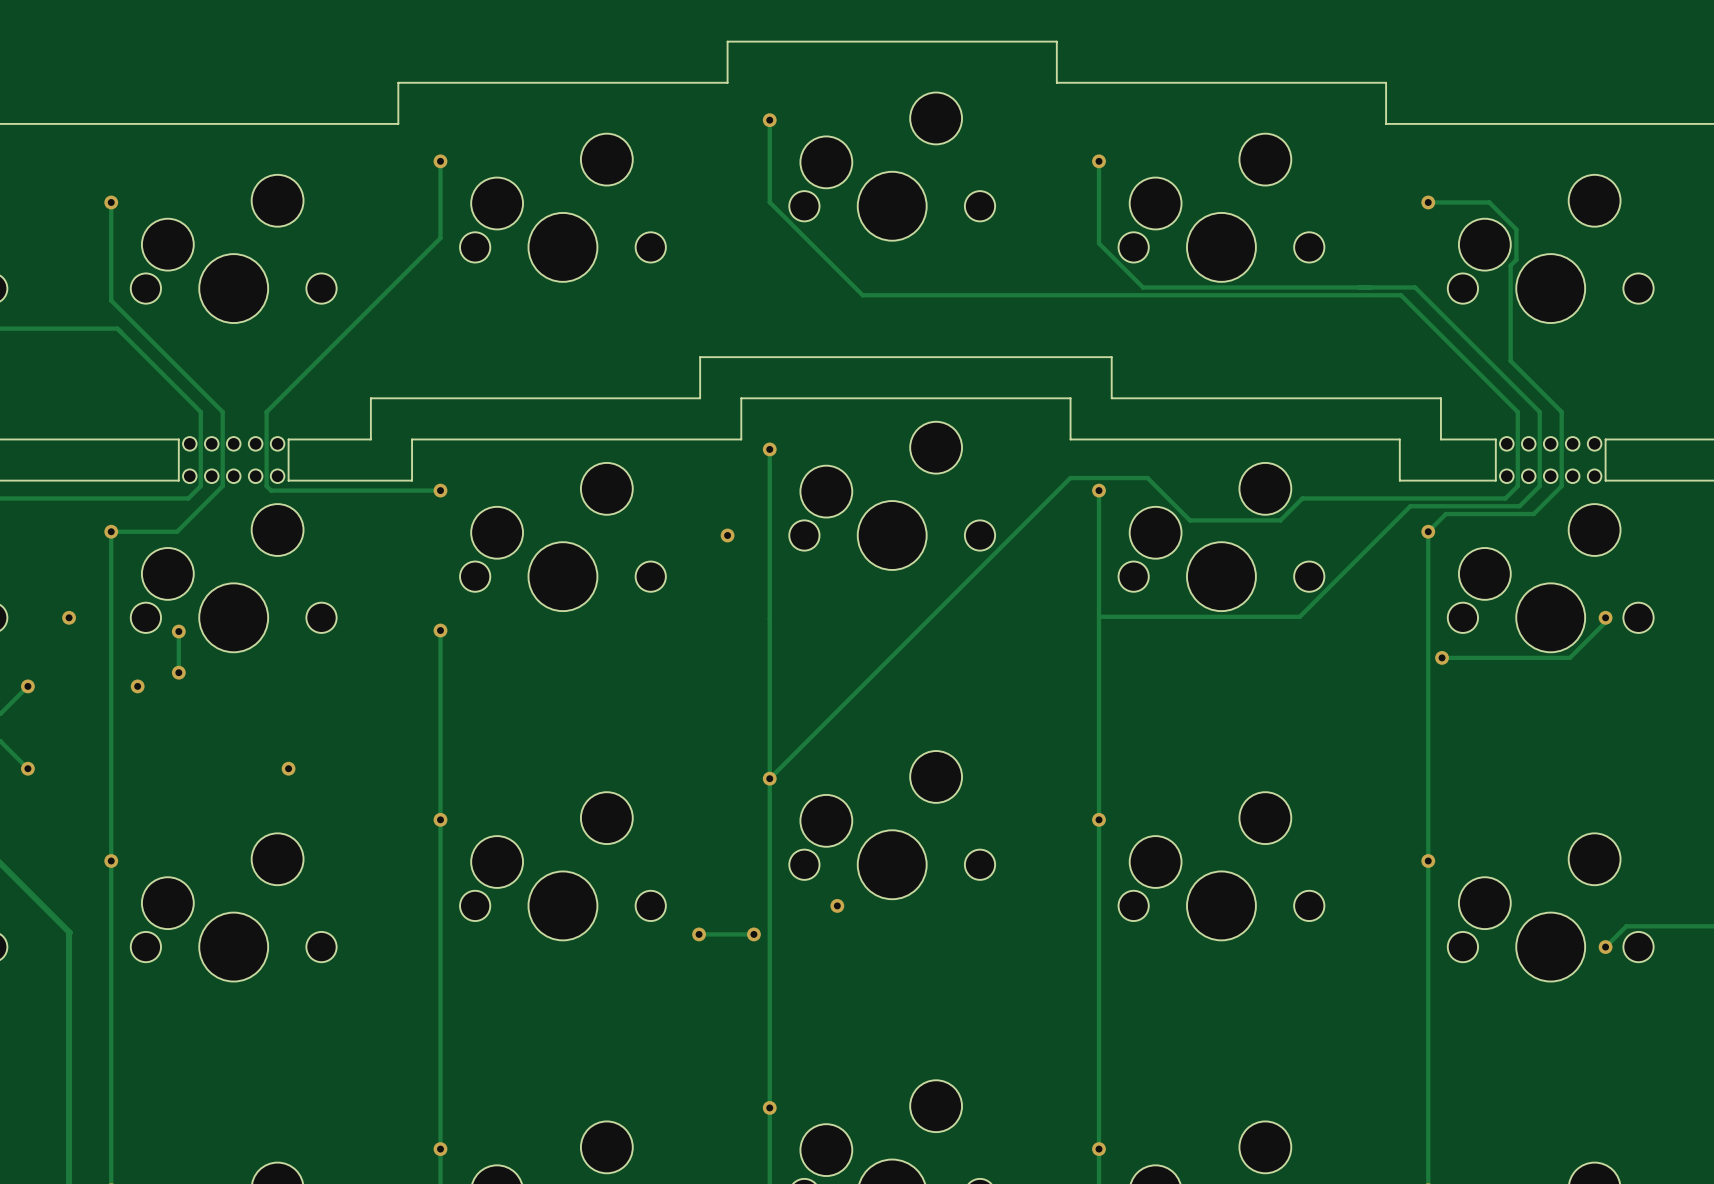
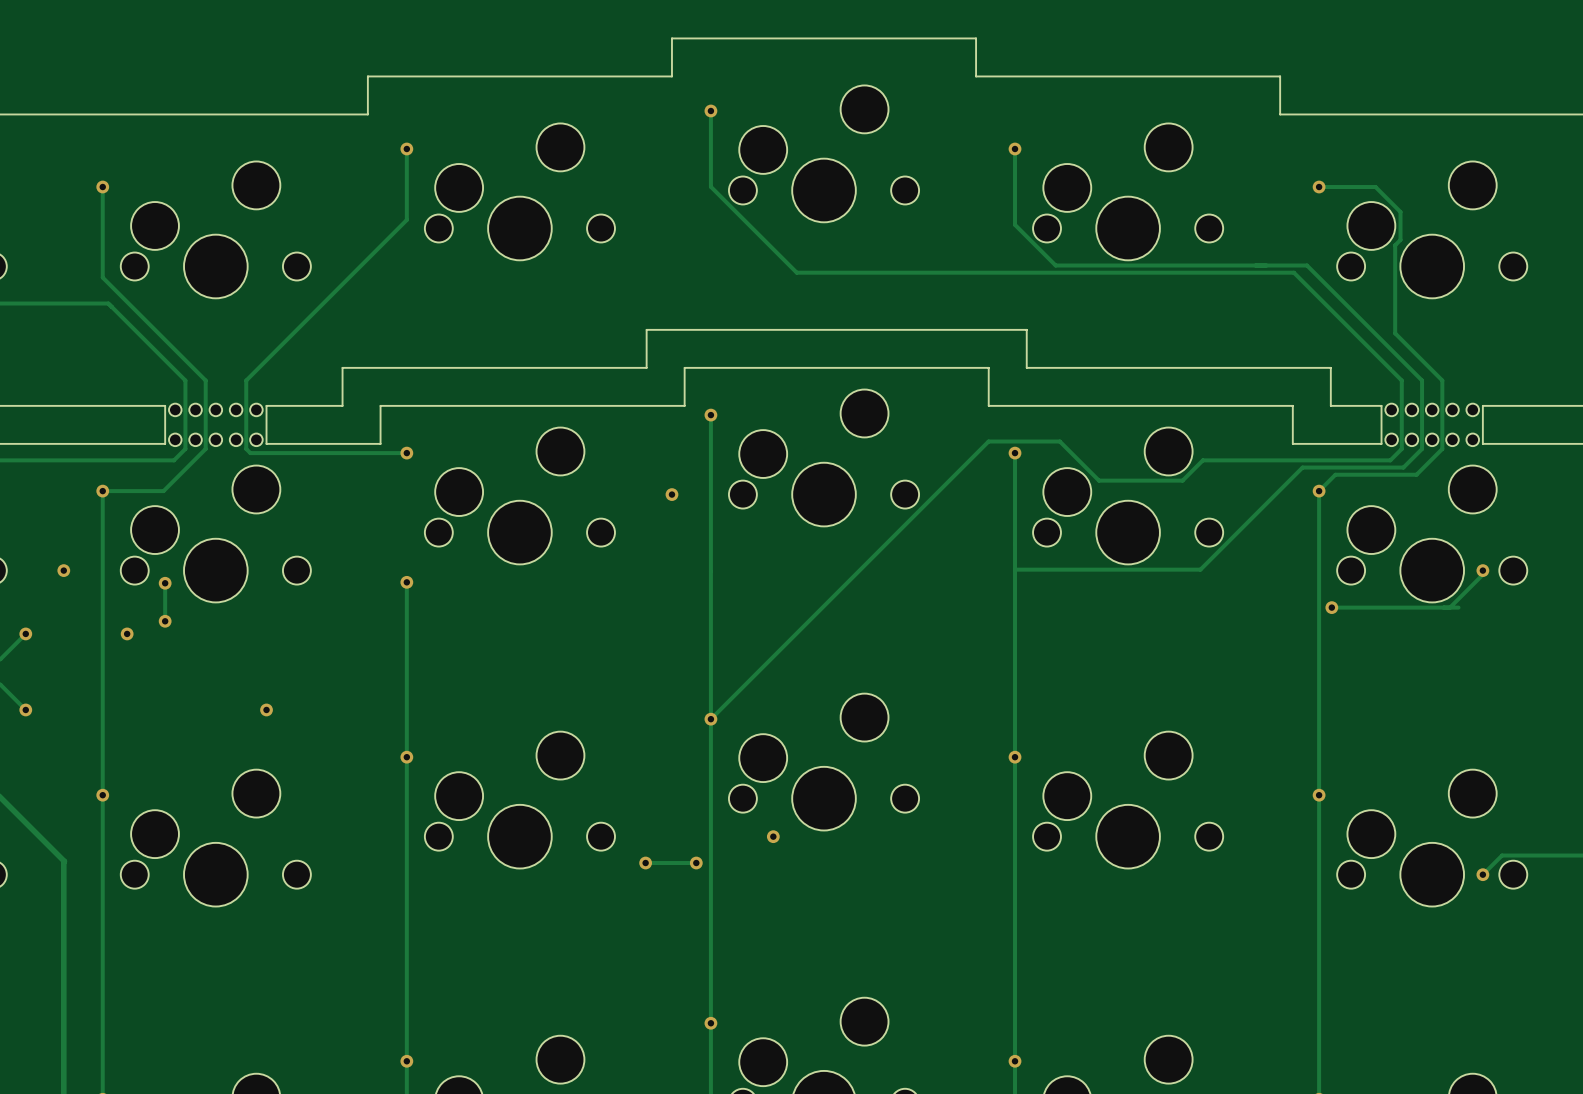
track: none -> (1449, 607) (1458, 607)

